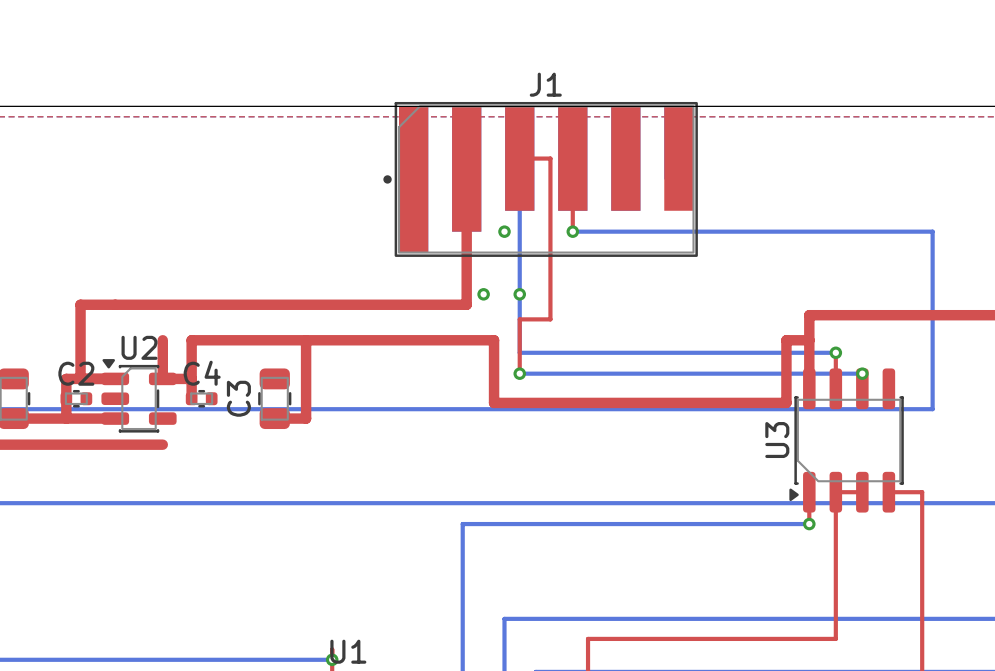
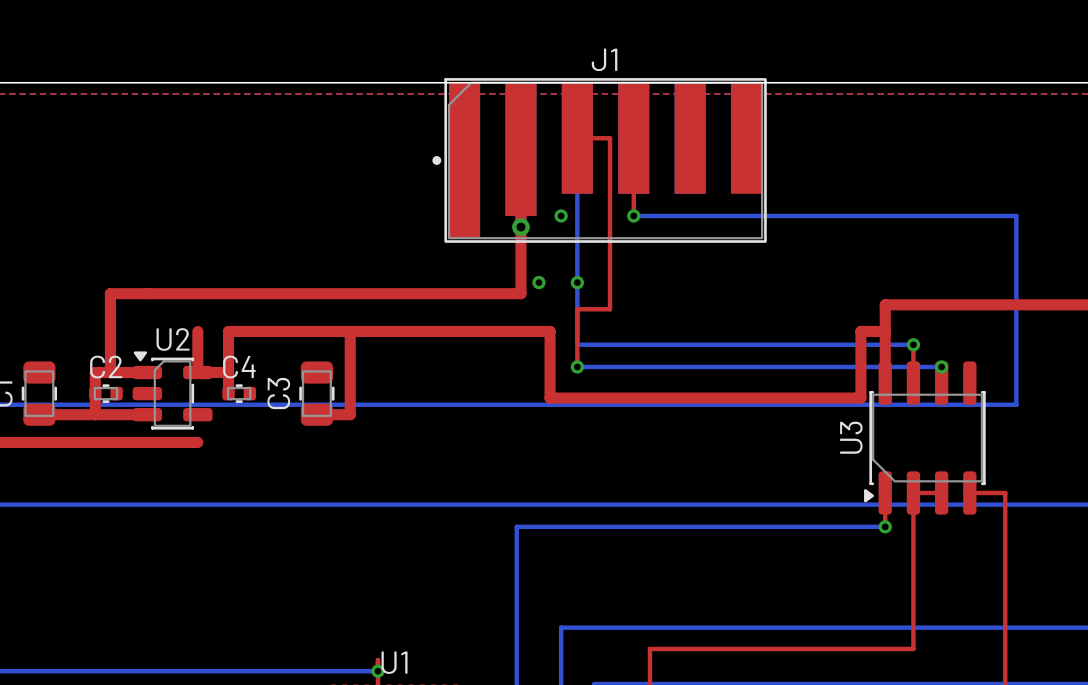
via: none -> (520, 227)

